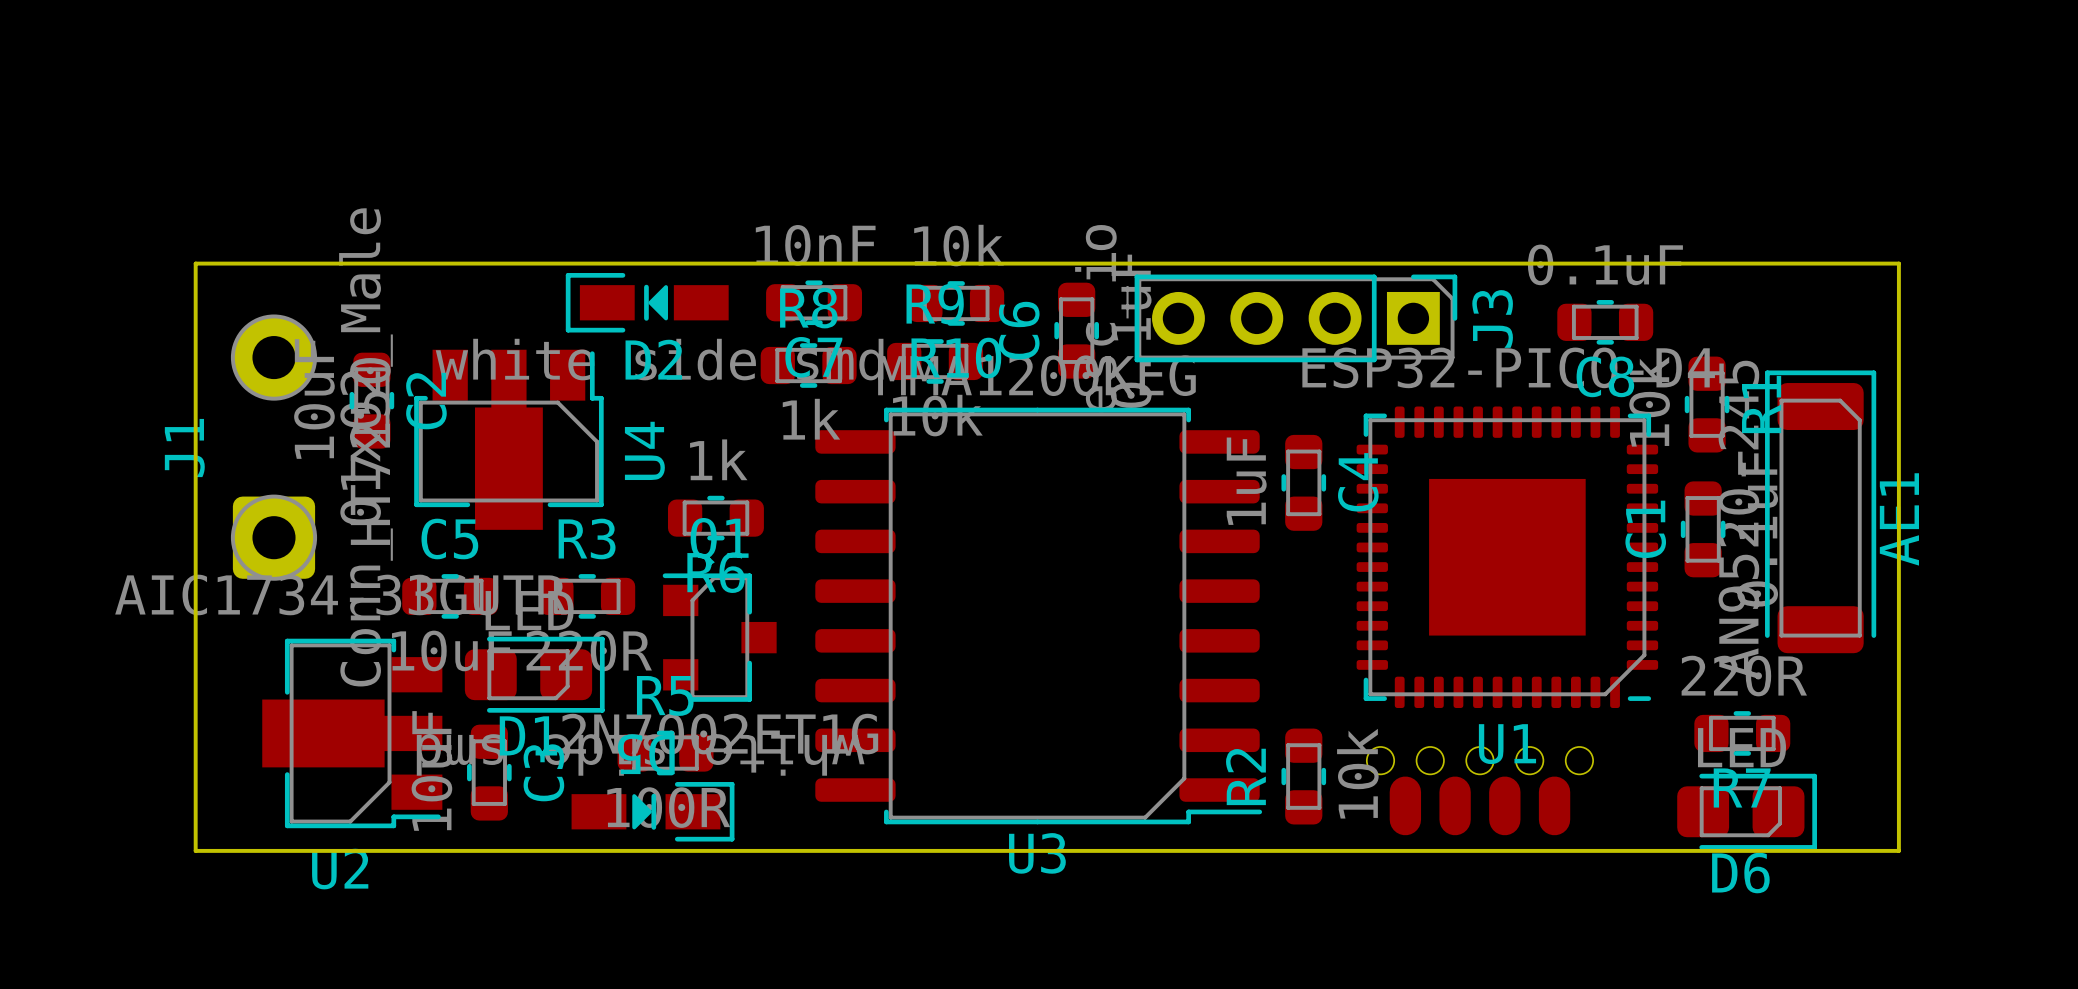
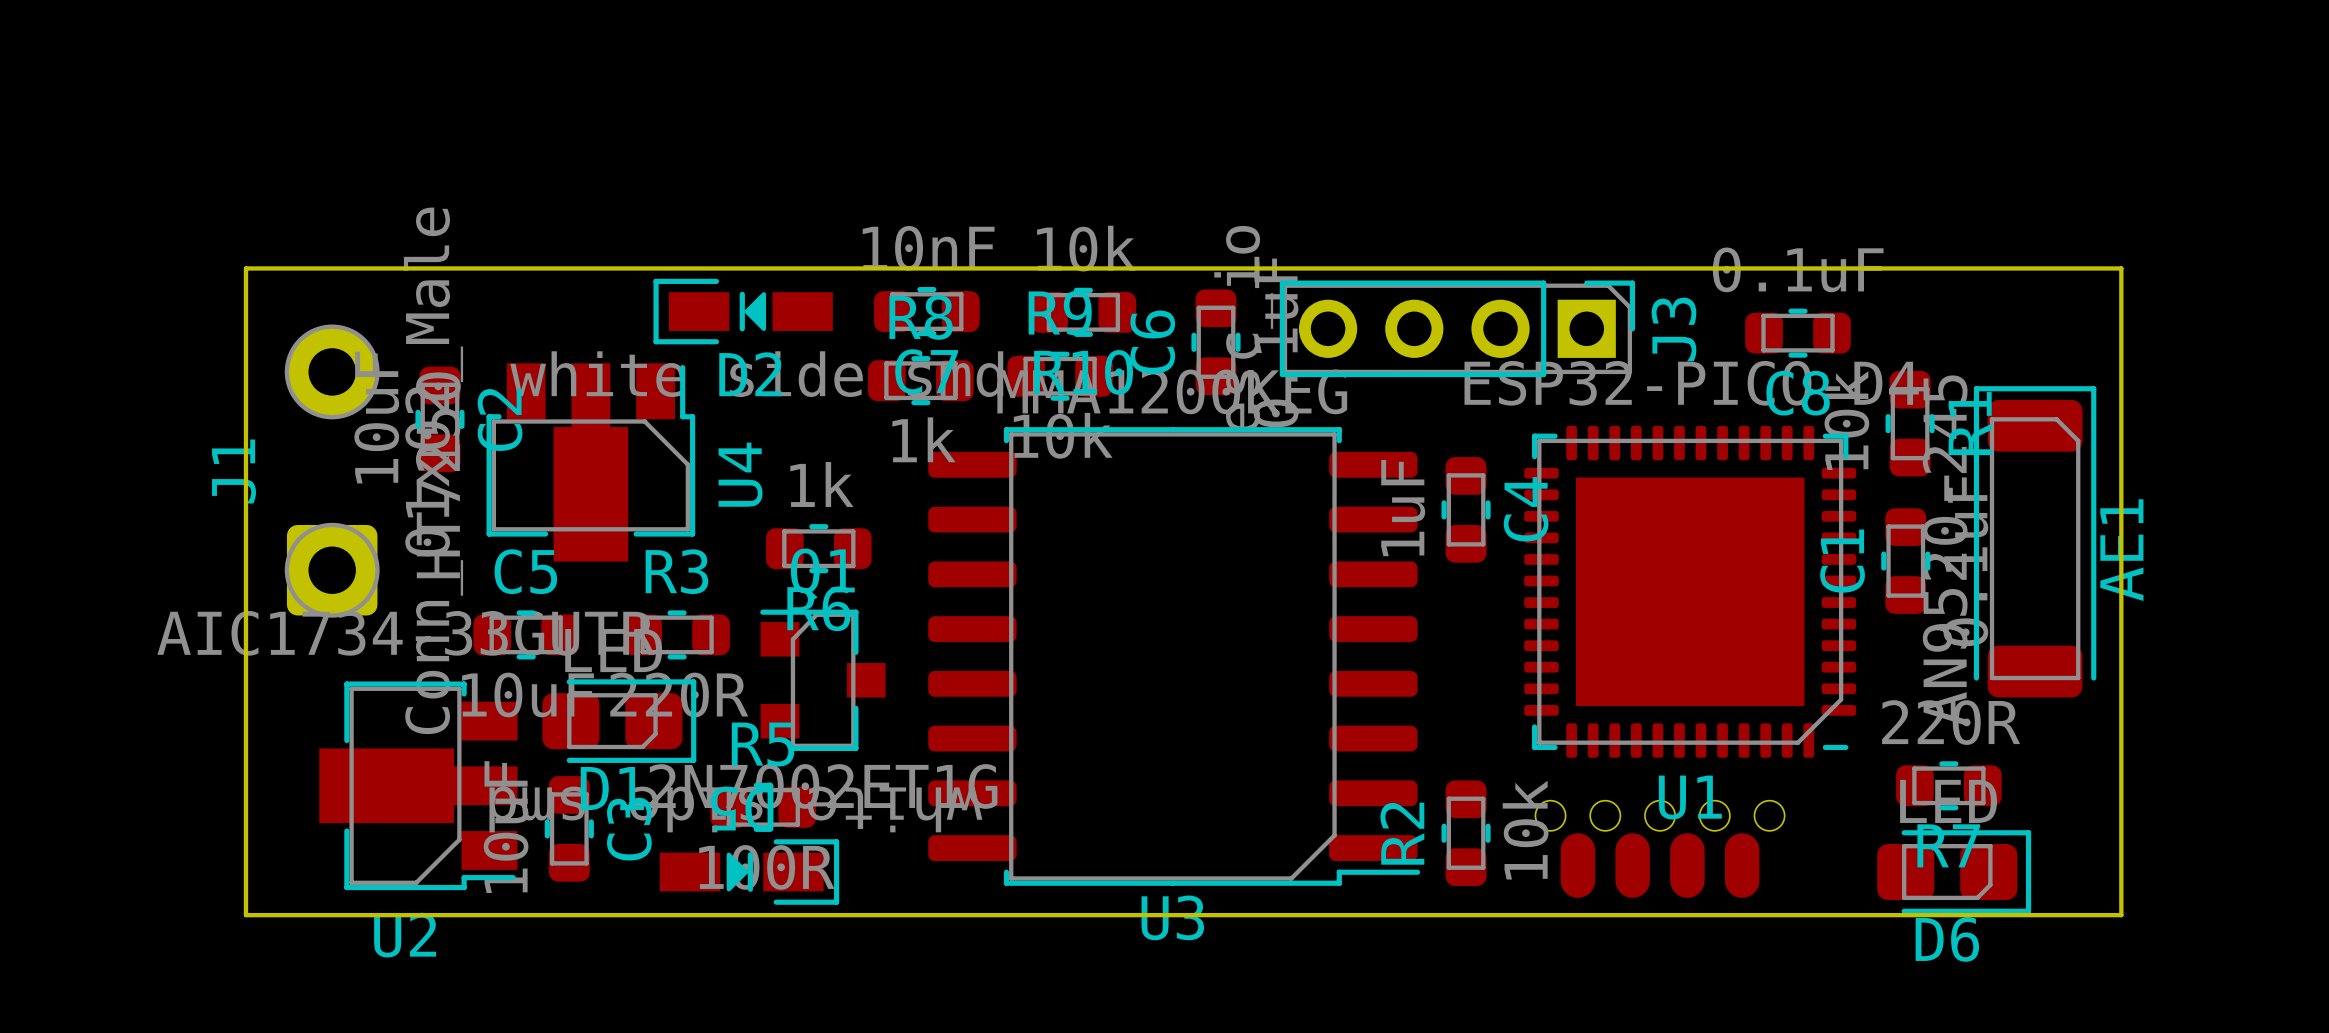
U1 footprint: [1356, 406, 1659, 709] -> [1524, 425, 1857, 758]

